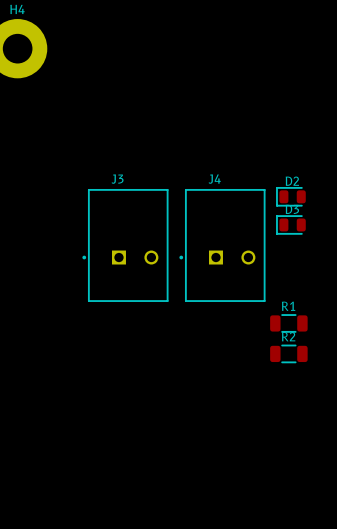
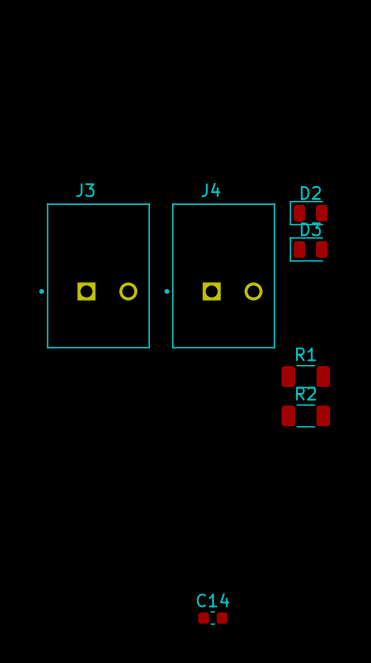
C14: none -> (212, 618)

